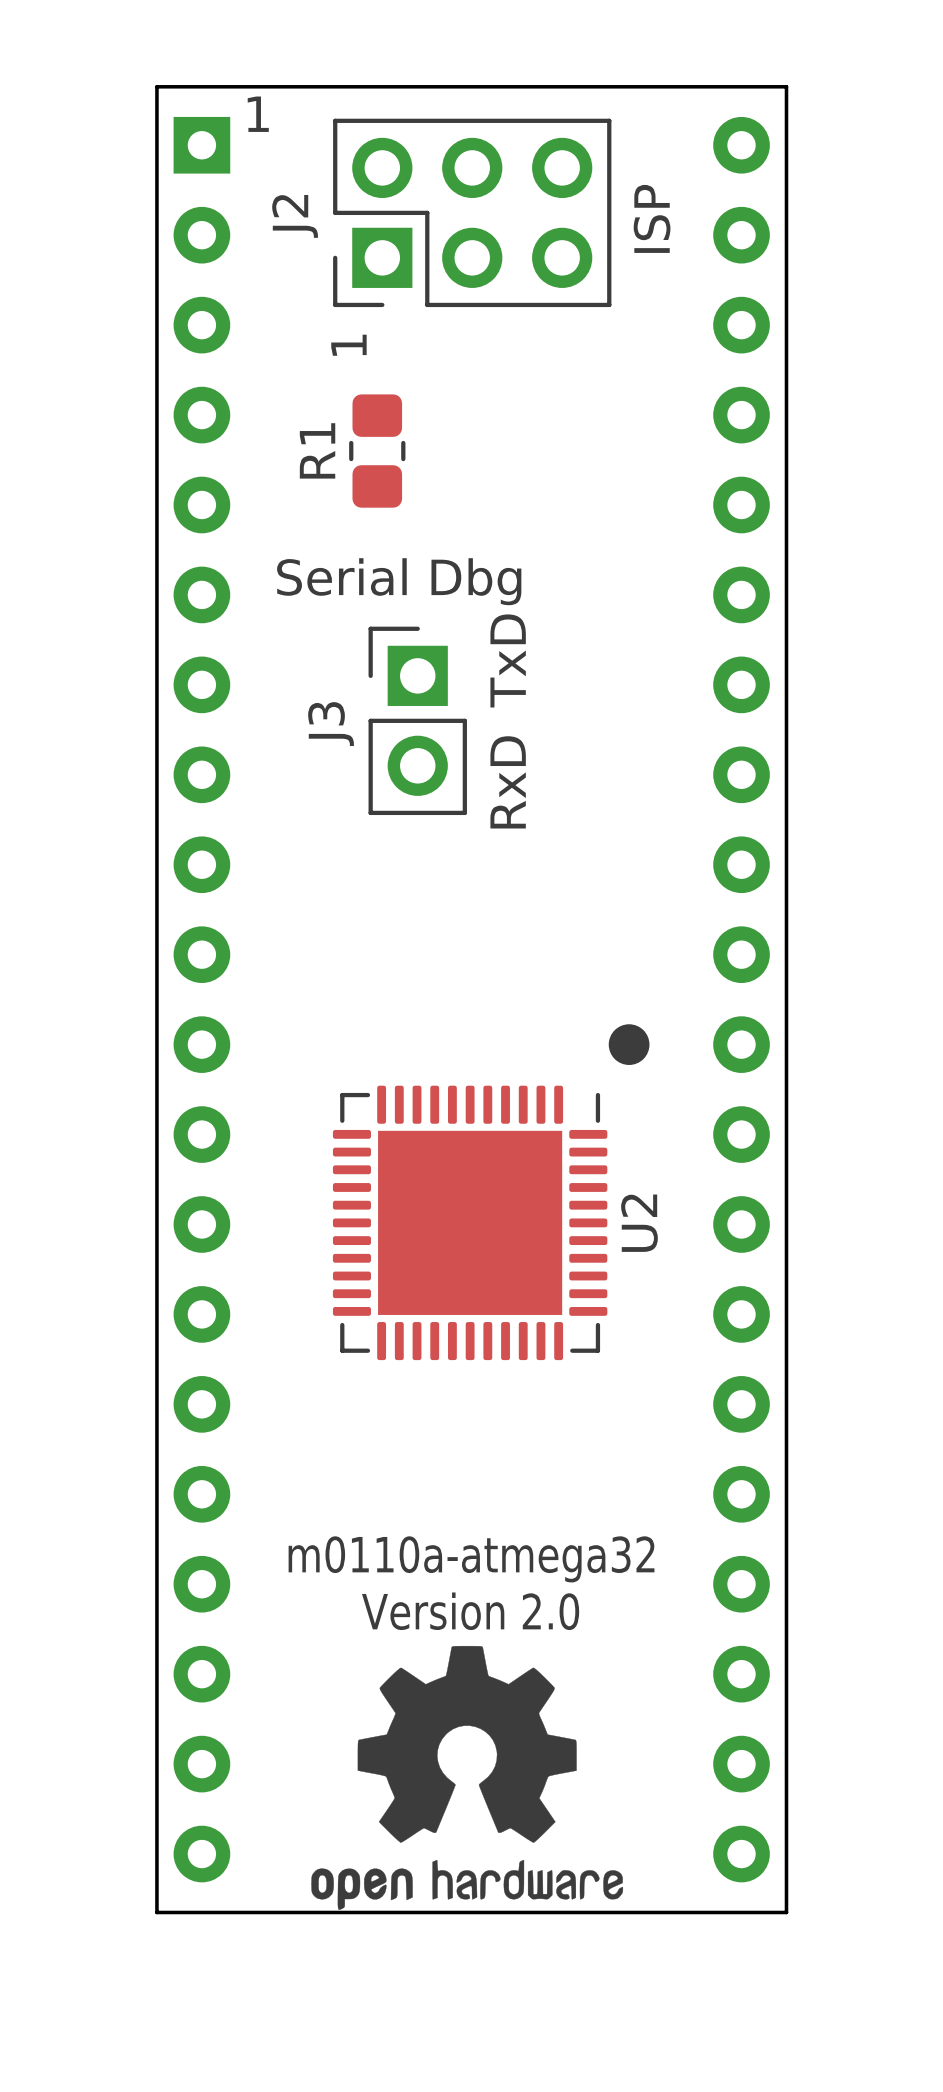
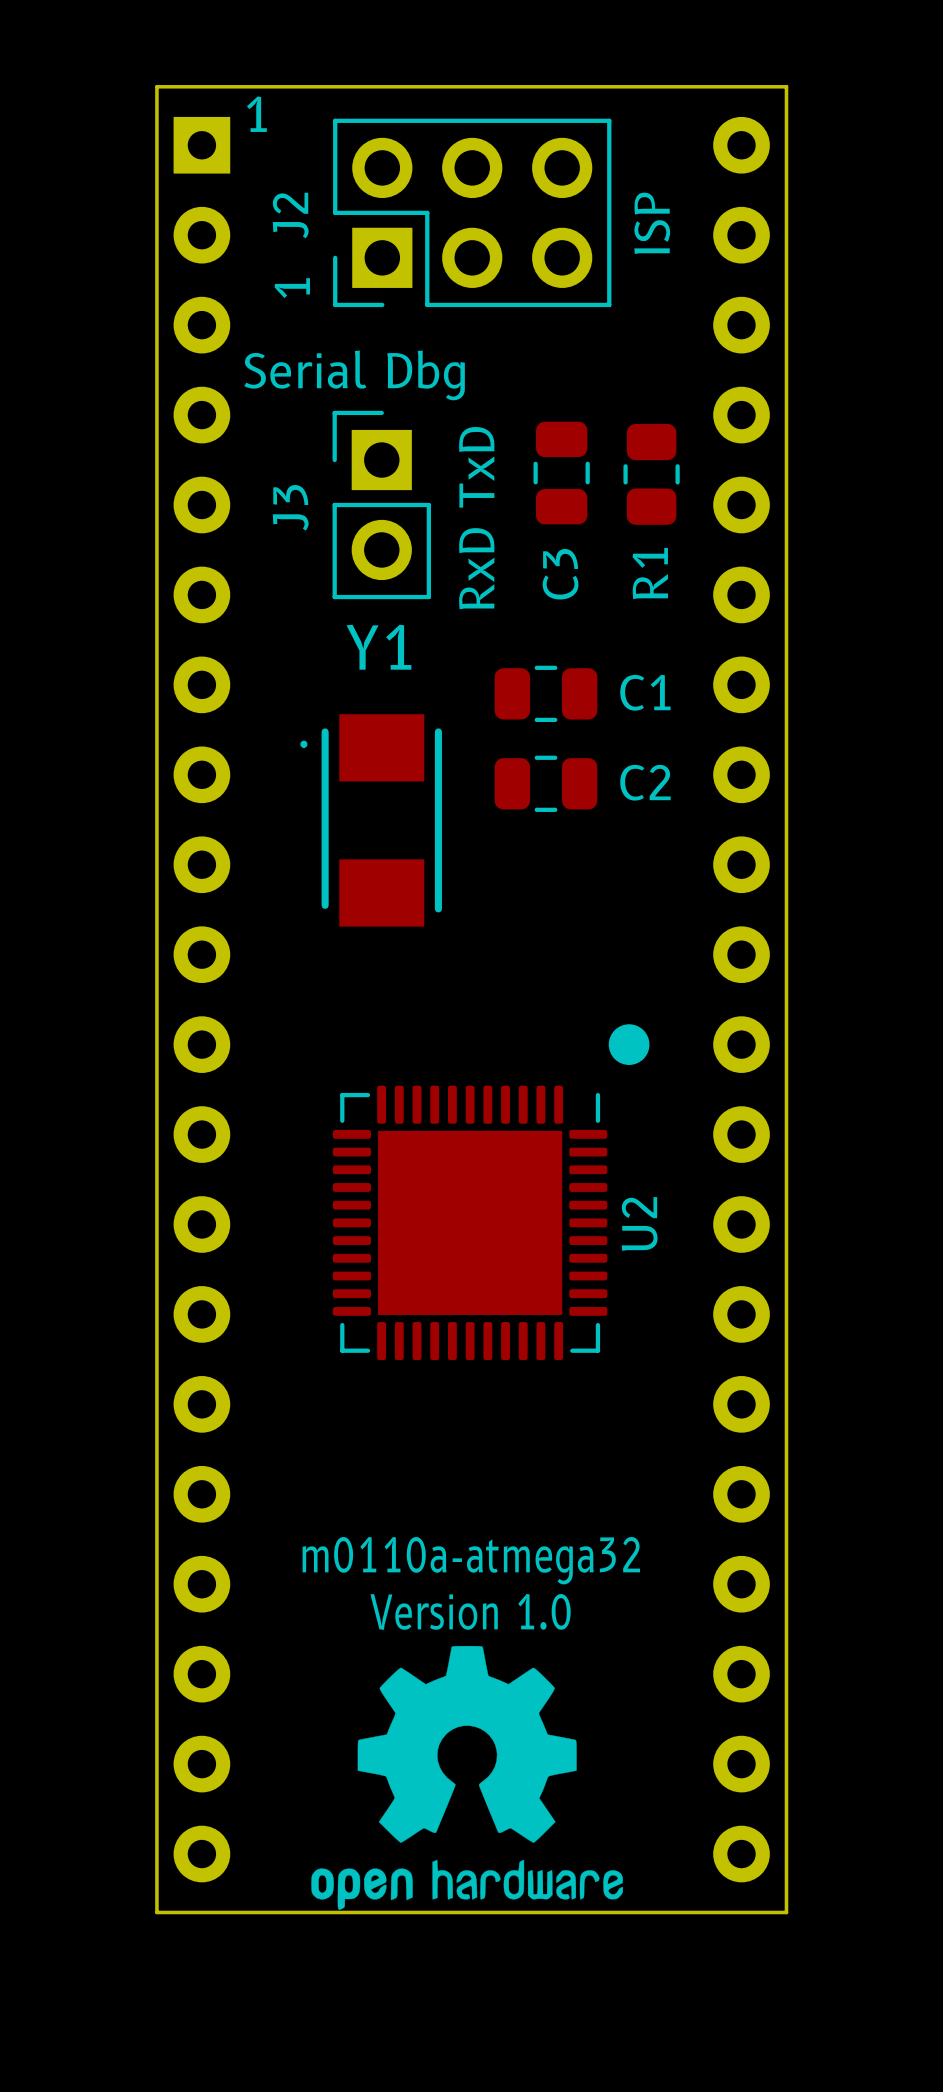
text position: 1 (348, 345) -> 1 (292, 288)
R1 footprint: [349, 394, 406, 508] -> [623, 423, 680, 525]
R1 name position: R1 (317, 450) -> R1 (650, 573)
C3: none -> (561, 473)
text position: Serial Dbg (399, 581) -> Serial Dbg (354, 375)
text position: TxD (508, 660) -> TxD (476, 467)
C1: none -> (546, 693)
J3 position: (417, 720) -> (381, 505)
text position: RxD (508, 782) -> RxD (476, 568)
C2: none -> (546, 783)
Y1: none -> (371, 820)
text: Version 2.0 (470, 1611) -> Version 1.0 (470, 1611)

